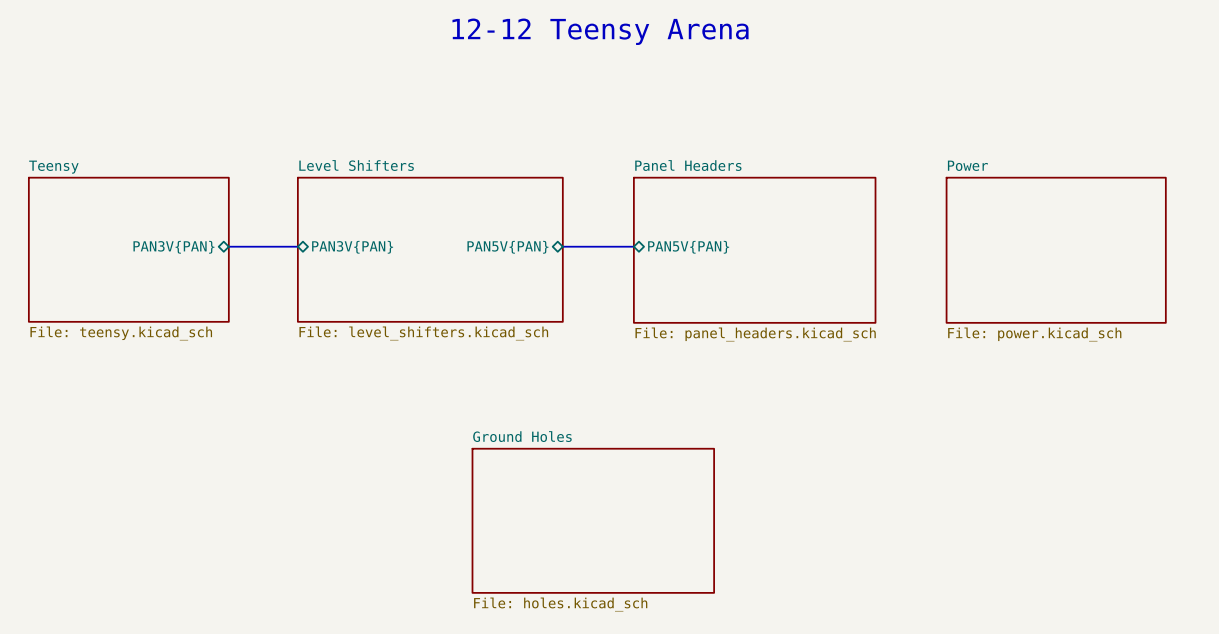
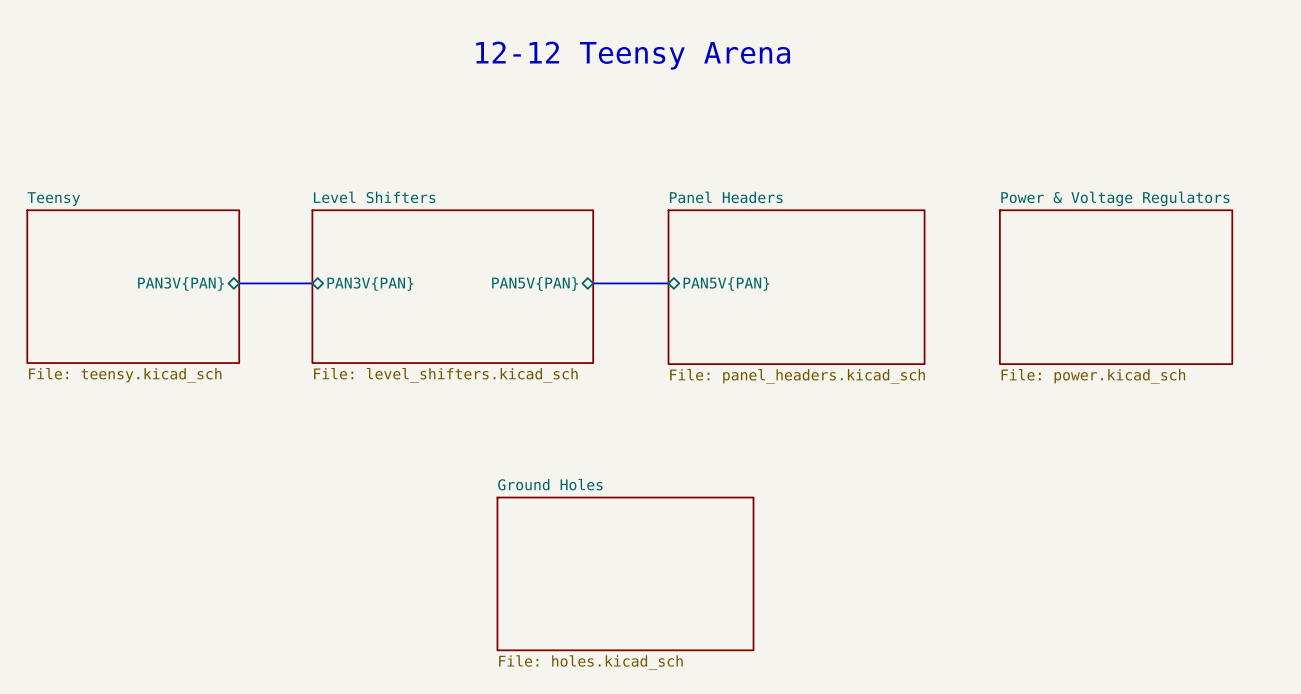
sheet Power name: Power (967, 165) -> Power & Voltage Regulators (1115, 198)

